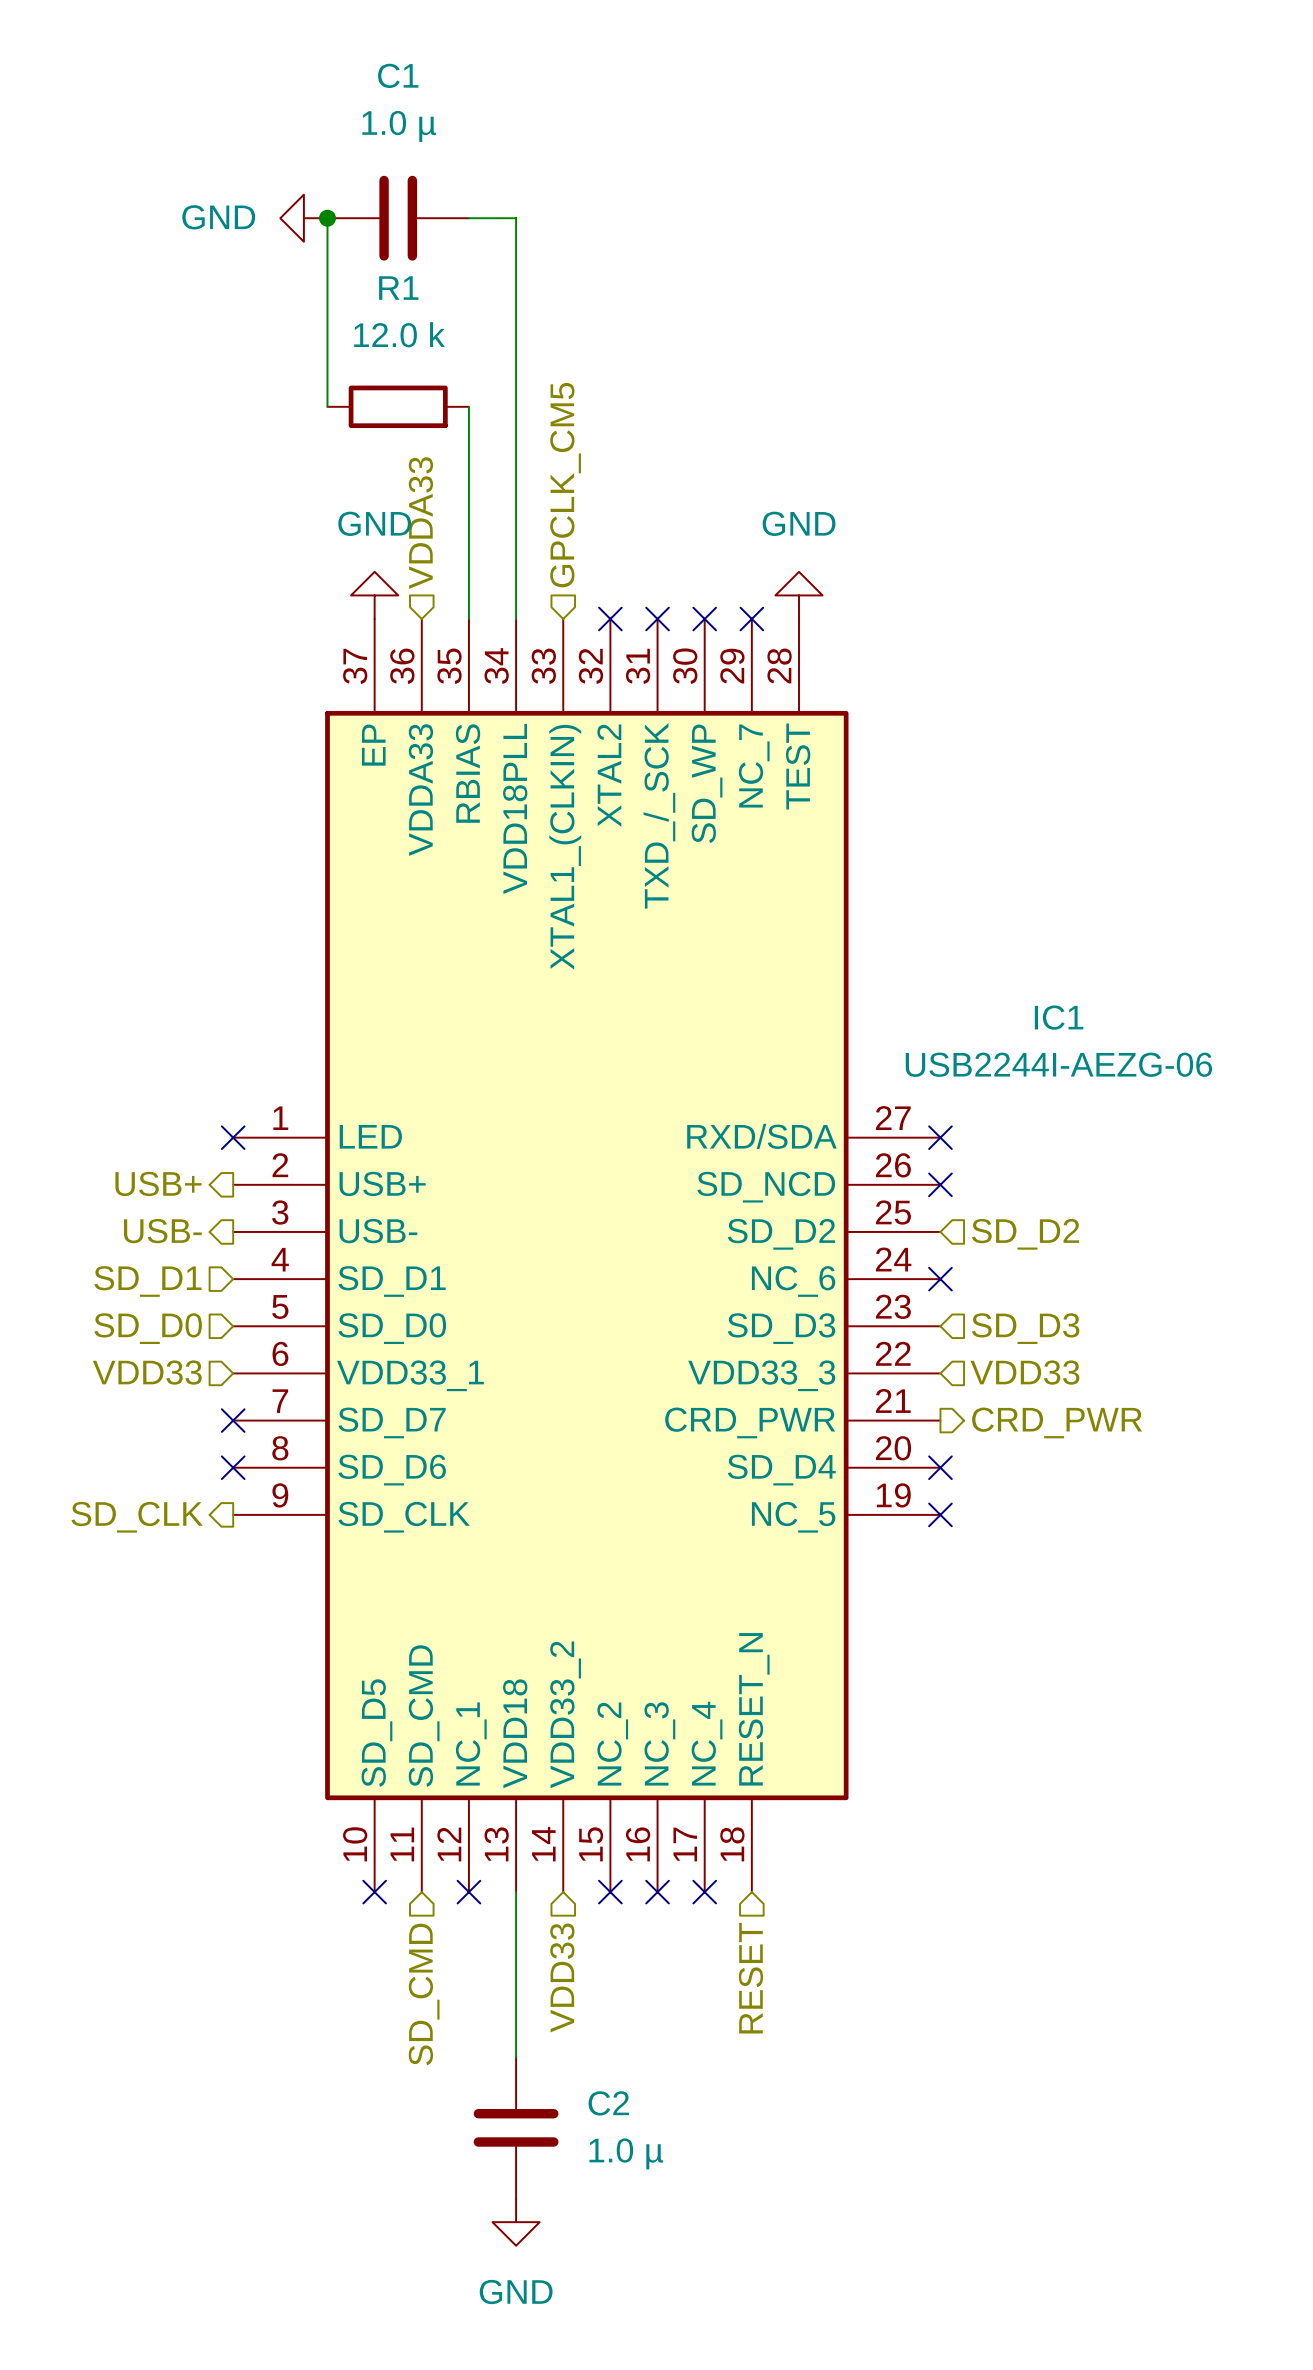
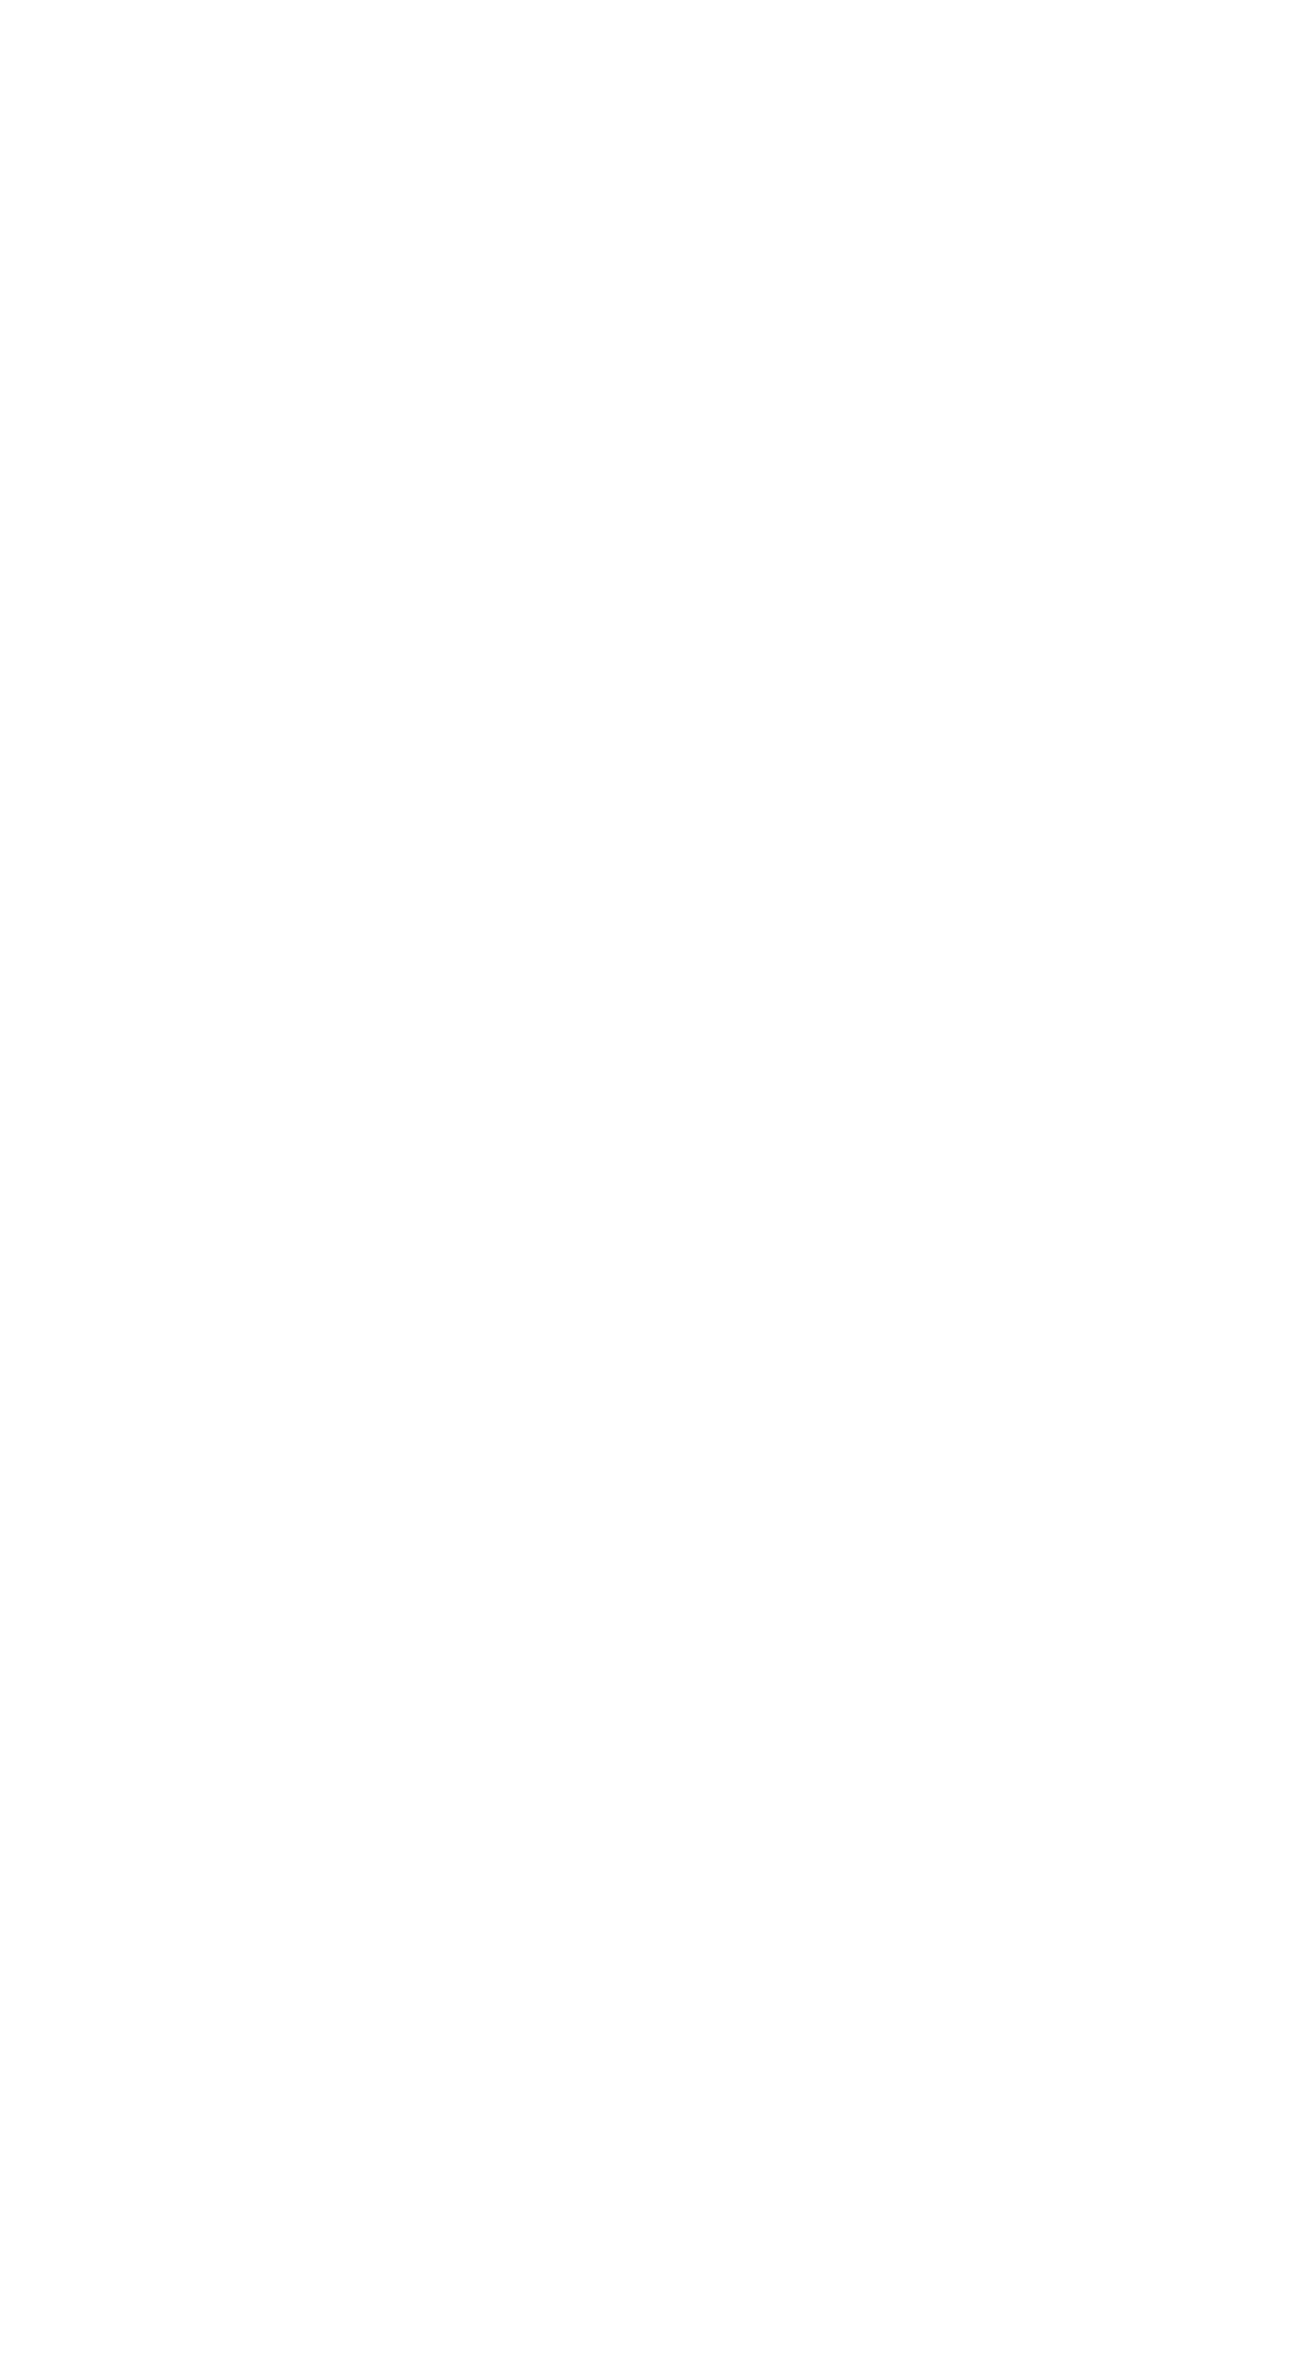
power symbol: GND (303, 218) -> none
wire: (327, 218) (327, 406) -> none
junction: (327, 218) -> none
C1: 1.0 µ (398, 218) -> none
wire: (468, 218) (516, 218) (516, 619) -> none
R1: 12.0 k (398, 406) -> none
wire: (468, 406) (468, 619) -> none
hierarchical label: GPCLK_CM5 (565, 485) -> none
hierarchical label: VDDA33 (420, 523) -> none
power symbol: GND (374, 595) -> none
power symbol: GND (799, 595) -> none
no-connect mark: (610, 619) -> none
no-connect mark: (657, 619) -> none
no-connect mark: (704, 619) -> none
no-connect mark: (751, 619) -> none
no-connect mark: (233, 1137) -> none
no-connect mark: (940, 1137) -> none
hierarchical label: USB+ (158, 1183) -> none
no-connect mark: (940, 1184) -> none
hierarchical label: USB- (162, 1231) -> none
hierarchical label: SD_D2 (1025, 1234) -> none
IC1: USB2244I-AEZG-06 (586, 1255) -> none
no-connect mark: (940, 1279) -> none
hierarchical label: SD_D1 (147, 1281) -> none
hierarchical label: SD_D0 (148, 1328) -> none
hierarchical label: SD_D3 (1025, 1328) -> none
hierarchical label: VDD33 (147, 1372) -> none
hierarchical label: VDD33 (1024, 1372) -> none
no-connect mark: (233, 1420) -> none
hierarchical label: CRD_PWR (1057, 1422) -> none
no-connect mark: (233, 1467) -> none
no-connect mark: (940, 1467) -> none
no-connect mark: (940, 1514) -> none
hierarchical label: SD_CLK (137, 1517) -> none
no-connect mark: (374, 1892) -> none
no-connect mark: (468, 1892) -> none
wire: (516, 1892) (516, 2057) -> none
no-connect mark: (610, 1892) -> none
no-connect mark: (657, 1892) -> none
no-connect mark: (704, 1892) -> none
hierarchical label: VDD33 (562, 1977) -> none
hierarchical label: RESET (750, 1978) -> none
hierarchical label: SD_CMD (424, 1994) -> none
C2: 1.0 µ (516, 2127) -> none
power symbol: GND (516, 2222) -> none

